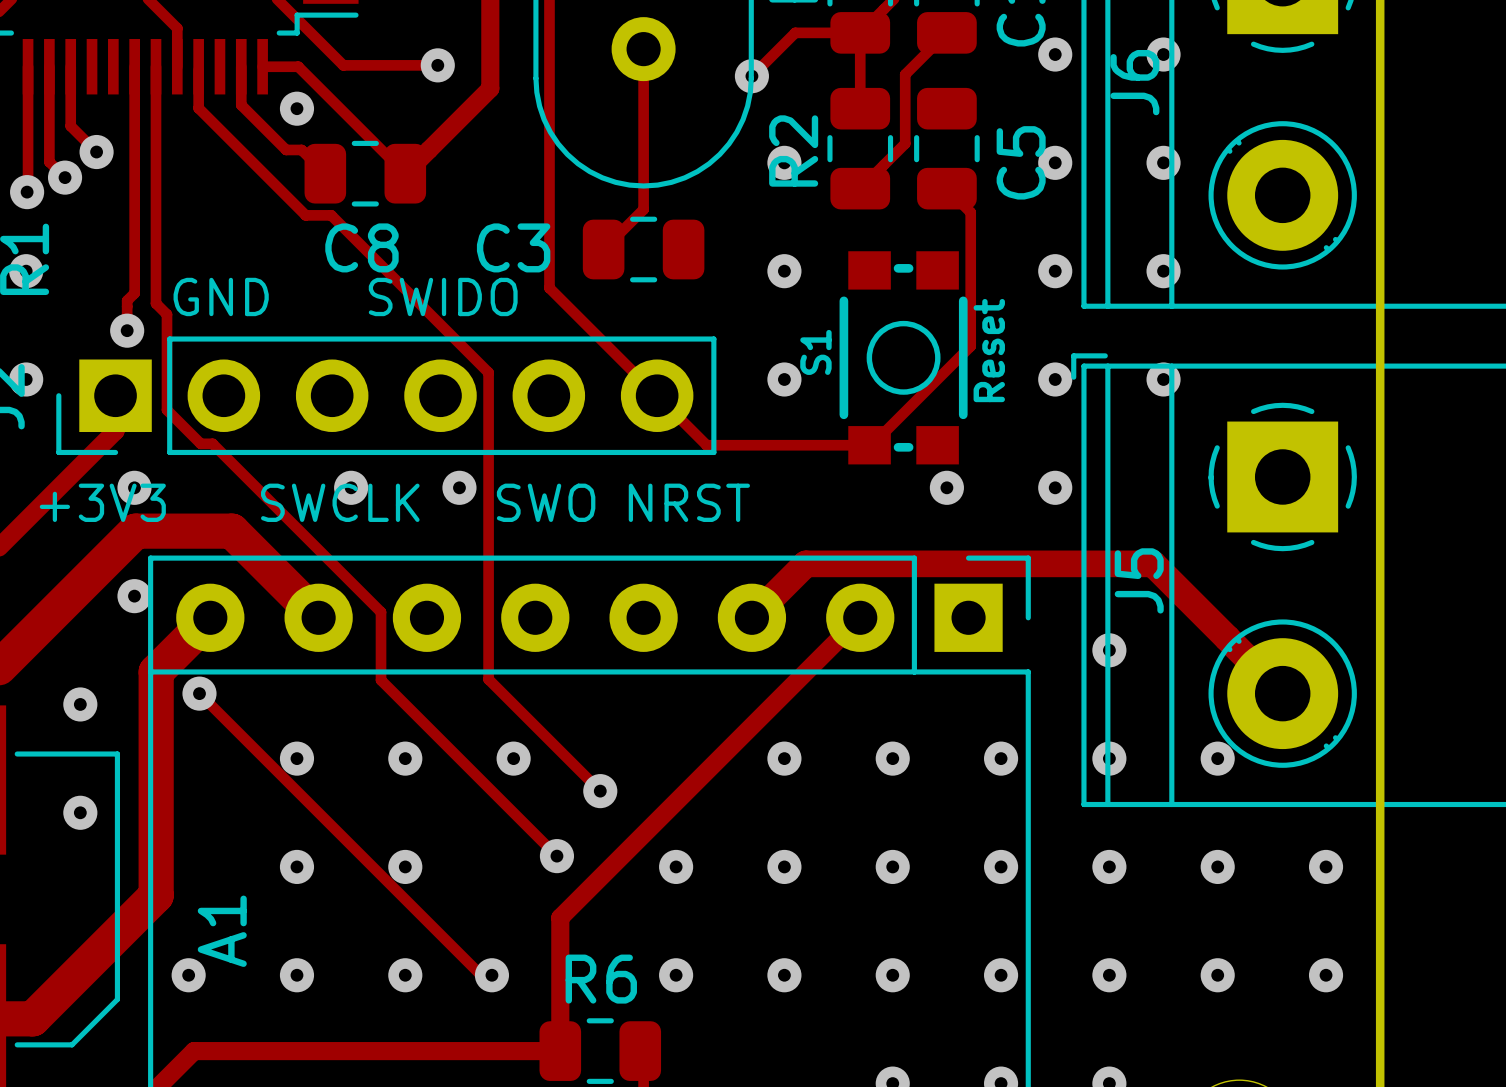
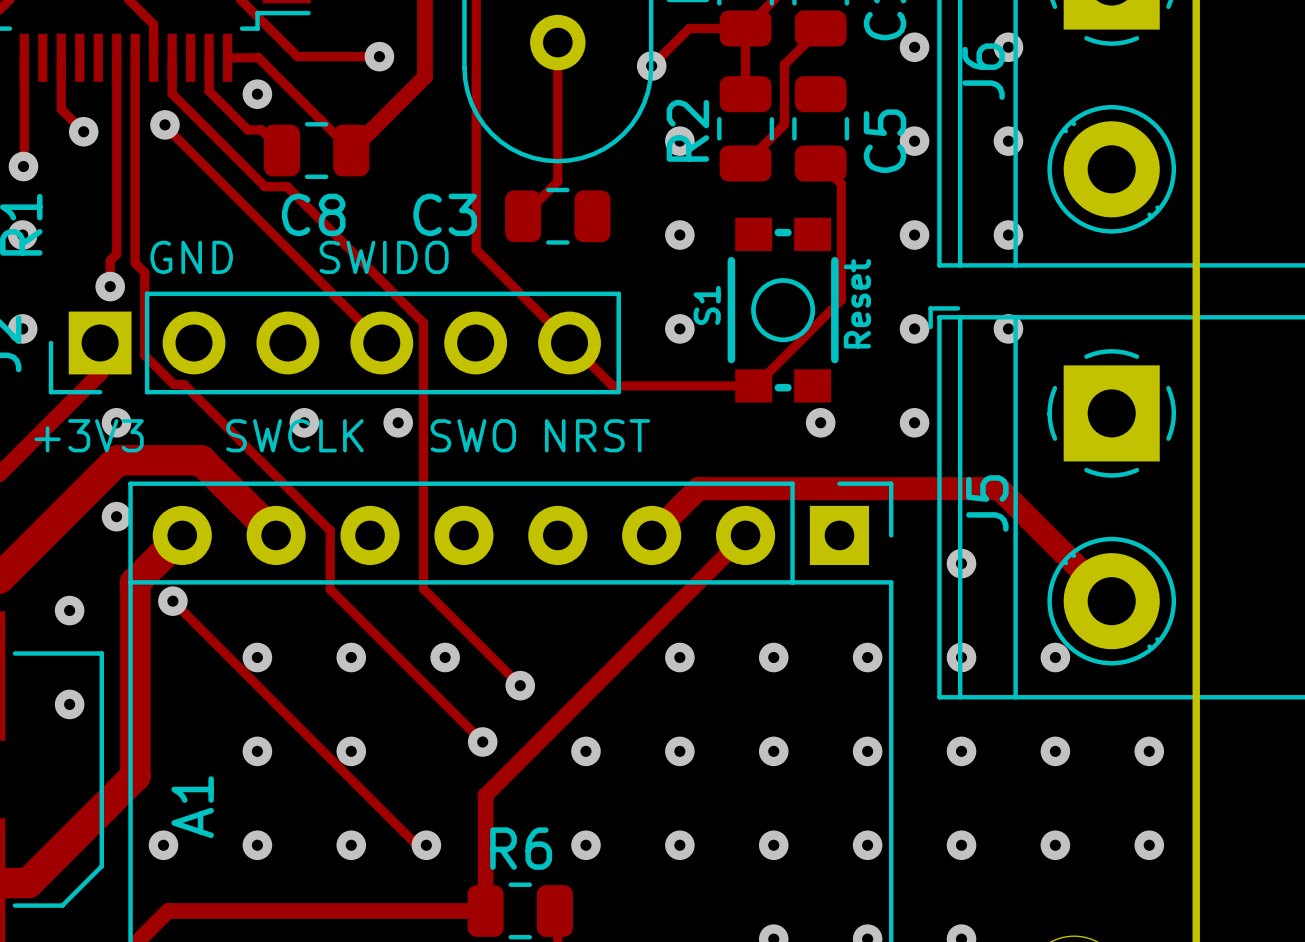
track: (49, 66) (49, 161) (65, 177) -> none
track: none -> (164, 124) (381, 342)
via: none -> (164, 124)
via: (65, 177) -> none

